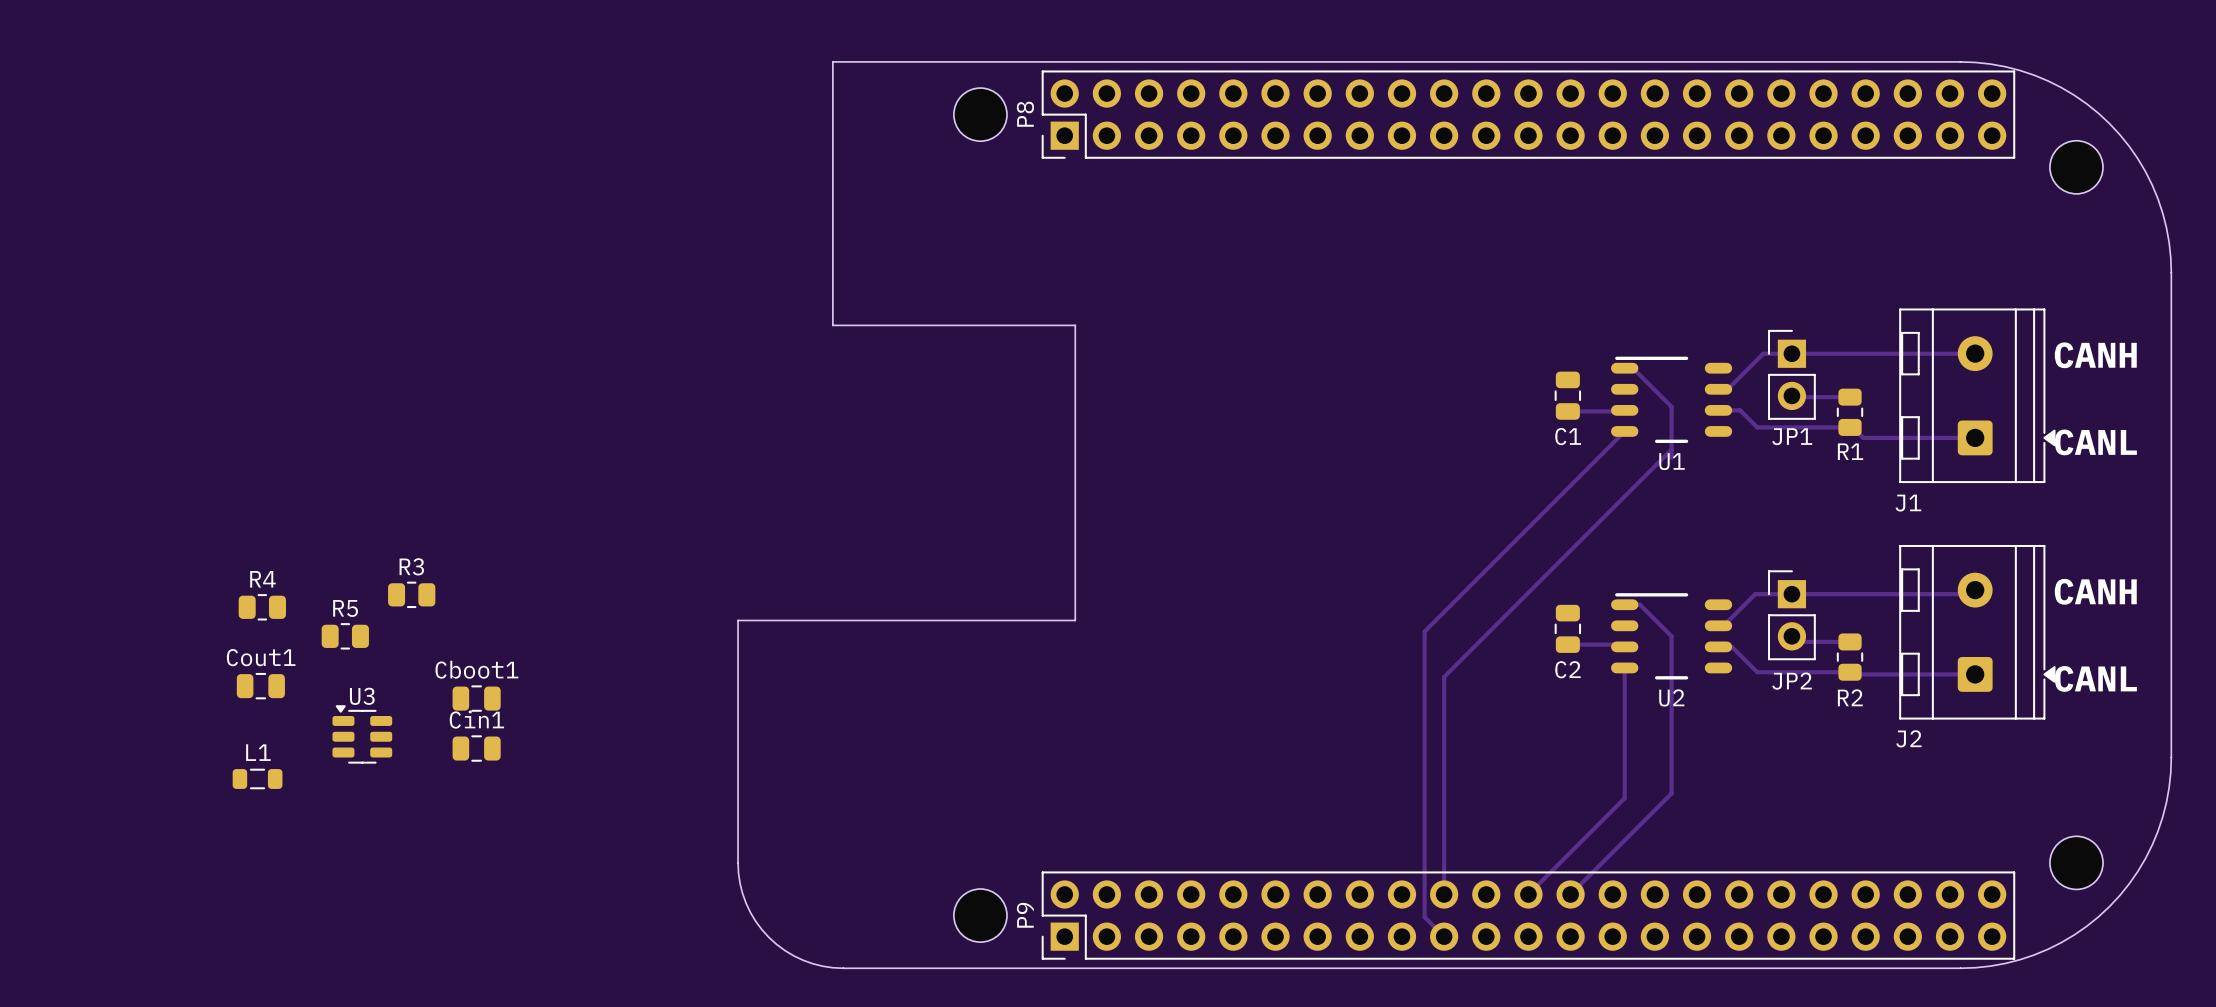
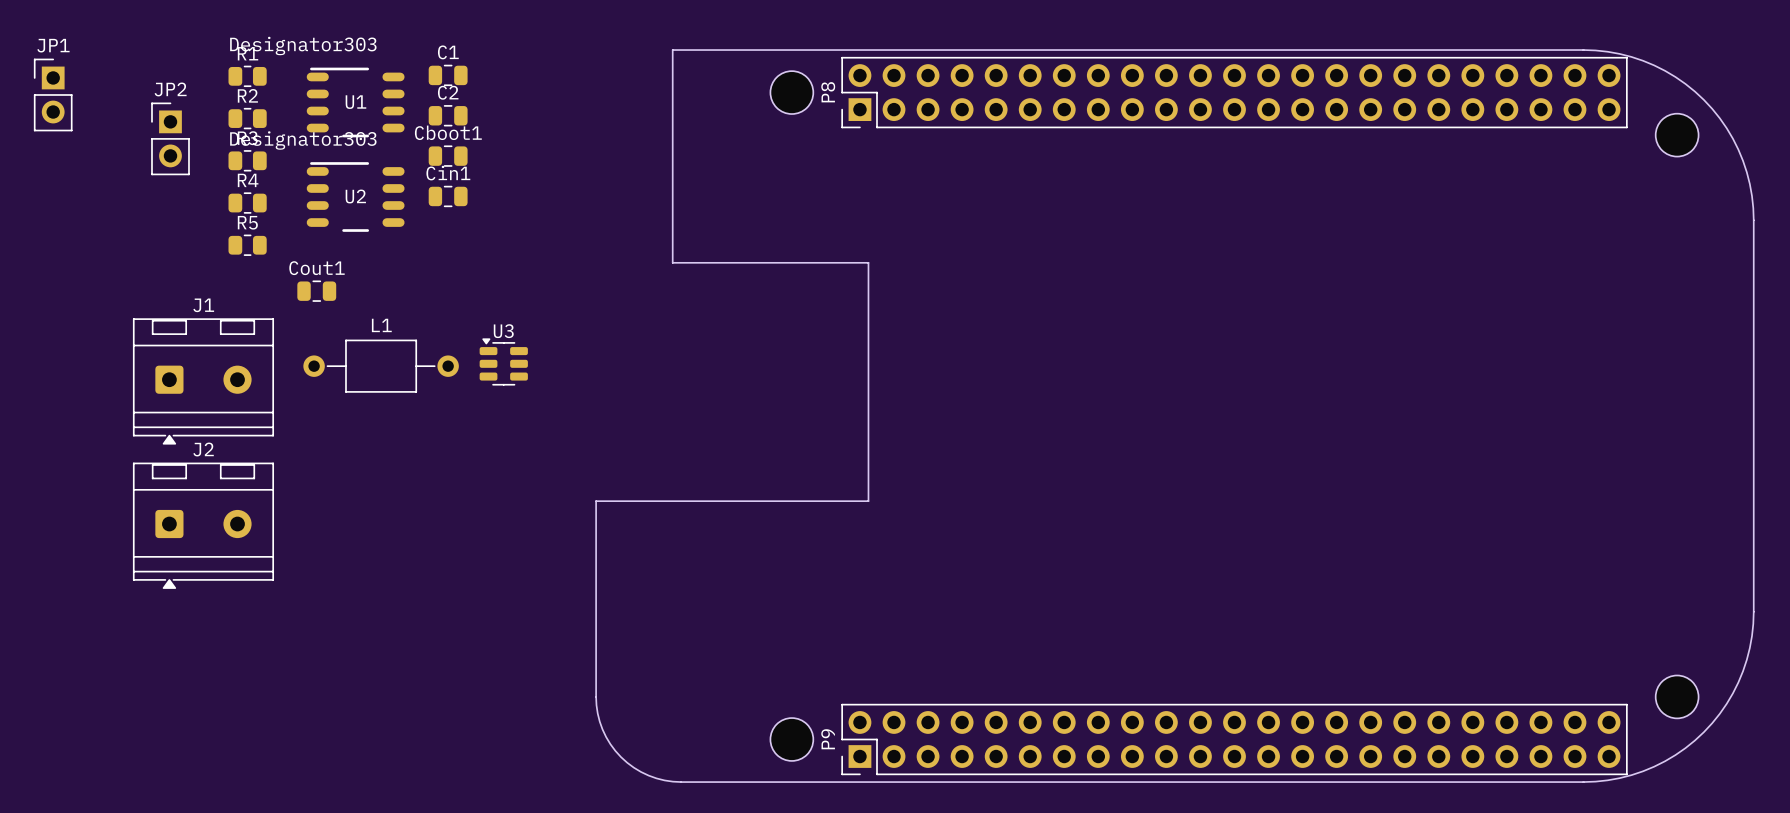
U1 text: none -> Designator303 (303, 46)
U2 text: none -> Designator303 (303, 140)
track: (1975, 353) (1763, 353) (1727, 389) (1718, 389) -> none
text: CANH (2095, 355) -> none
track: (1624, 368) (1633, 368) (1671, 406) (1671, 457) -> none
JP1 position: (1791, 374) -> (53, 94)
C1 rotation: 0° (1567, 395) -> 90° clockwise (448, 75)
C1 position: (1567, 395) -> (448, 75)
track: (1791, 395) (1850, 397) -> none
J1 rotation: 0° (1977, 395) -> 90° clockwise (203, 381)
J1 position: (1977, 395) -> (203, 381)
U1 position: (1671, 399) -> (355, 102)
track: (1624, 410) (1567, 411) -> none
track: (1718, 410) (1740, 410) (1757, 427) (1852, 427) (1863, 437) (1975, 437) -> none
R1 rotation: 0° (1850, 412) -> 90° clockwise (247, 76)
R1 position: (1850, 412) -> (247, 76)
track: (1624, 431) (1424, 631) (1424, 917) (1444, 936) -> none
C1 name position: C1 (1568, 436) -> C1 (448, 52)
JP1 name position: JP1 (1792, 436) -> JP1 (53, 45)
text: CANL (2095, 442) -> none
track: (1671, 449) (1444, 677) (1444, 894) -> none
R1 name position: R1 (1850, 451) -> R1 (248, 53)
U1 name position: U1 (1671, 461) -> U1 (355, 102)
J1 name position: J1 (1908, 503) -> J1 (203, 305)
track: (1975, 590) (1971, 594) (1755, 594) (1723, 625) (1718, 625) -> none
text: CANH (2095, 591) -> none
R3 position: (411, 594) -> (247, 160)
track: (1624, 604) (1639, 604) (1671, 636) (1671, 793) (1570, 894) -> none
R4 position: (262, 607) -> (247, 203)
JP2 position: (1791, 615) -> (170, 138)
C2 rotation: 0° (1567, 628) -> 90° clockwise (448, 115)
C2 position: (1567, 628) -> (448, 115)
J2 rotation: 0° (1977, 632) -> 90° clockwise (203, 525)
J2 position: (1977, 632) -> (203, 525)
R5 position: (345, 636) -> (247, 245)
U2 position: (1671, 636) -> (355, 197)
track: (1791, 636) (1797, 641) (1850, 641) -> none
track: (1567, 644) (1622, 644) (1624, 646) -> none
track: (1718, 646) (1731, 646) (1757, 672) (1975, 674) -> none
R2 rotation: 0° (1850, 657) -> 90° clockwise (247, 118)
R2 position: (1850, 657) -> (247, 118)
track: (1624, 667) (1624, 798) (1528, 894) -> none
C2 name position: C2 (1567, 669) -> C2 (448, 92)
text: CANL (2095, 678) -> none
JP2 name position: JP2 (1792, 681) -> JP2 (170, 89)
Cout1 position: (260, 686) -> (316, 291)
U2 name position: U2 (1671, 697) -> U2 (355, 196)
R2 name position: R2 (1850, 697) -> R2 (247, 95)
Cboot1 position: (476, 698) -> (448, 156)
U3 position: (362, 734) -> (503, 361)
J2 name position: J2 (1908, 738) -> J2 (203, 449)
Cin1 position: (476, 748) -> (448, 196)
L1 footprint: [232, 768, 283, 790] -> [303, 339, 459, 393]

